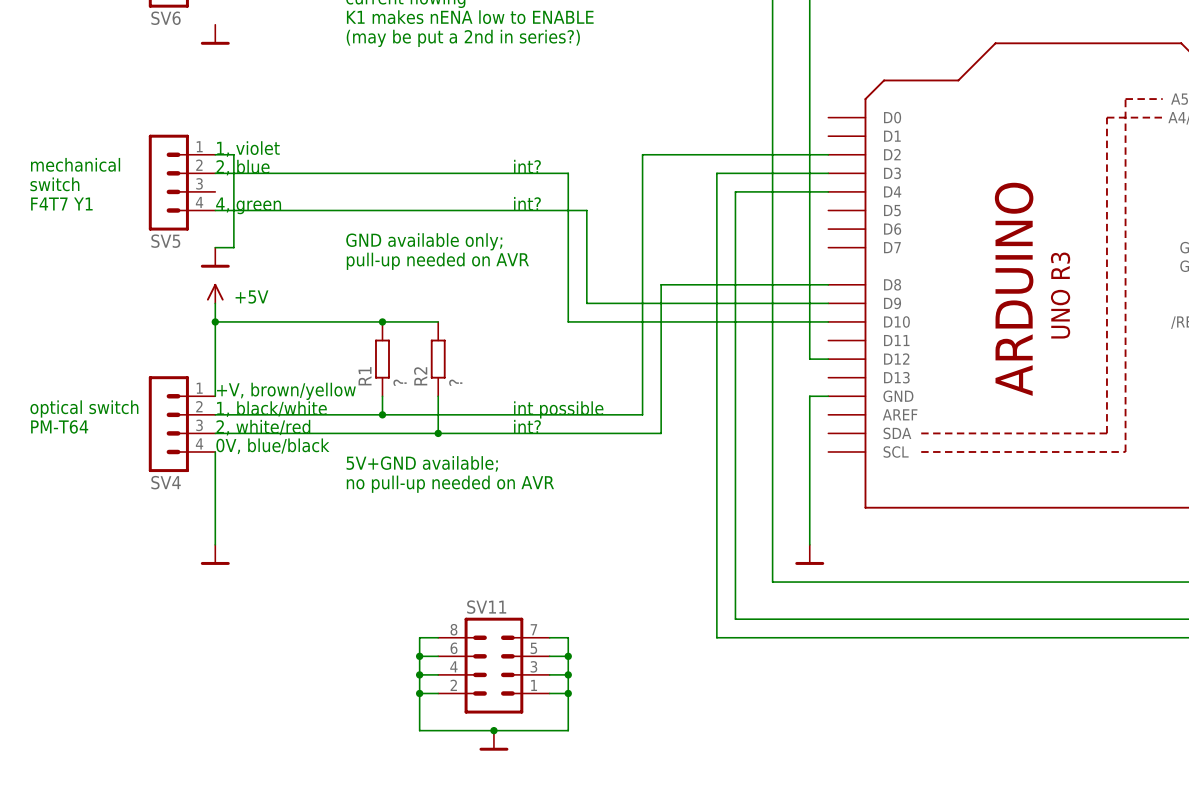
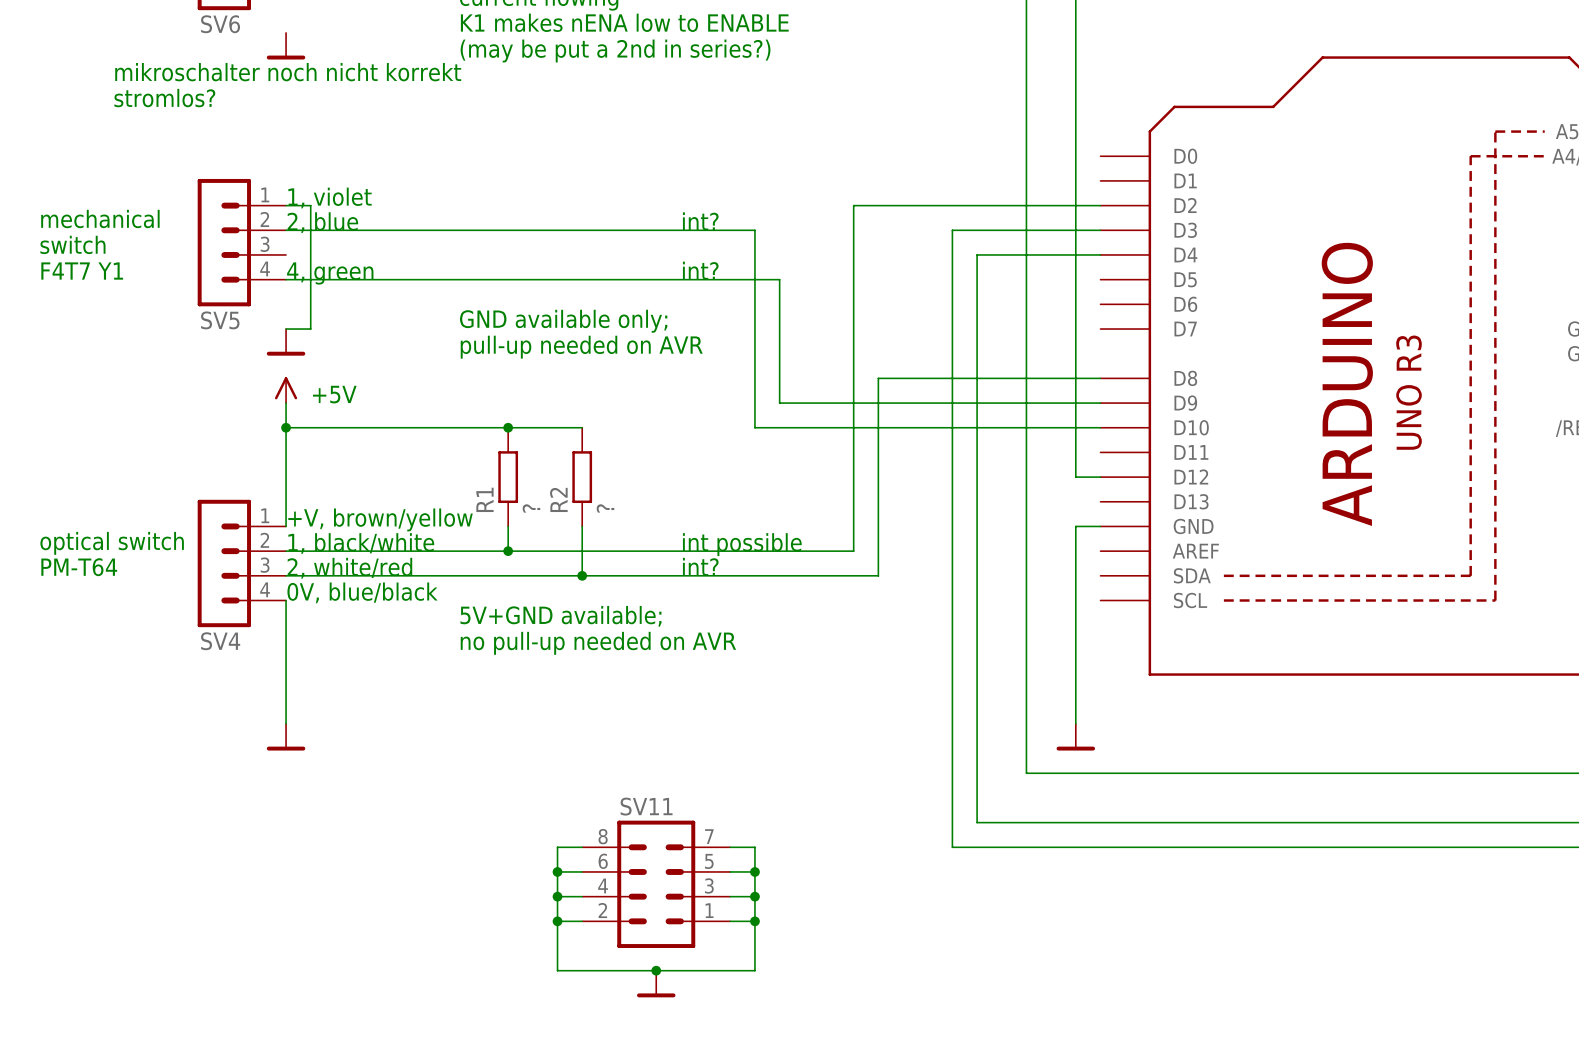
text: none -> mikroschalter noch nicht korrekt (288, 72)
text: none -> stromlos? (164, 98)

